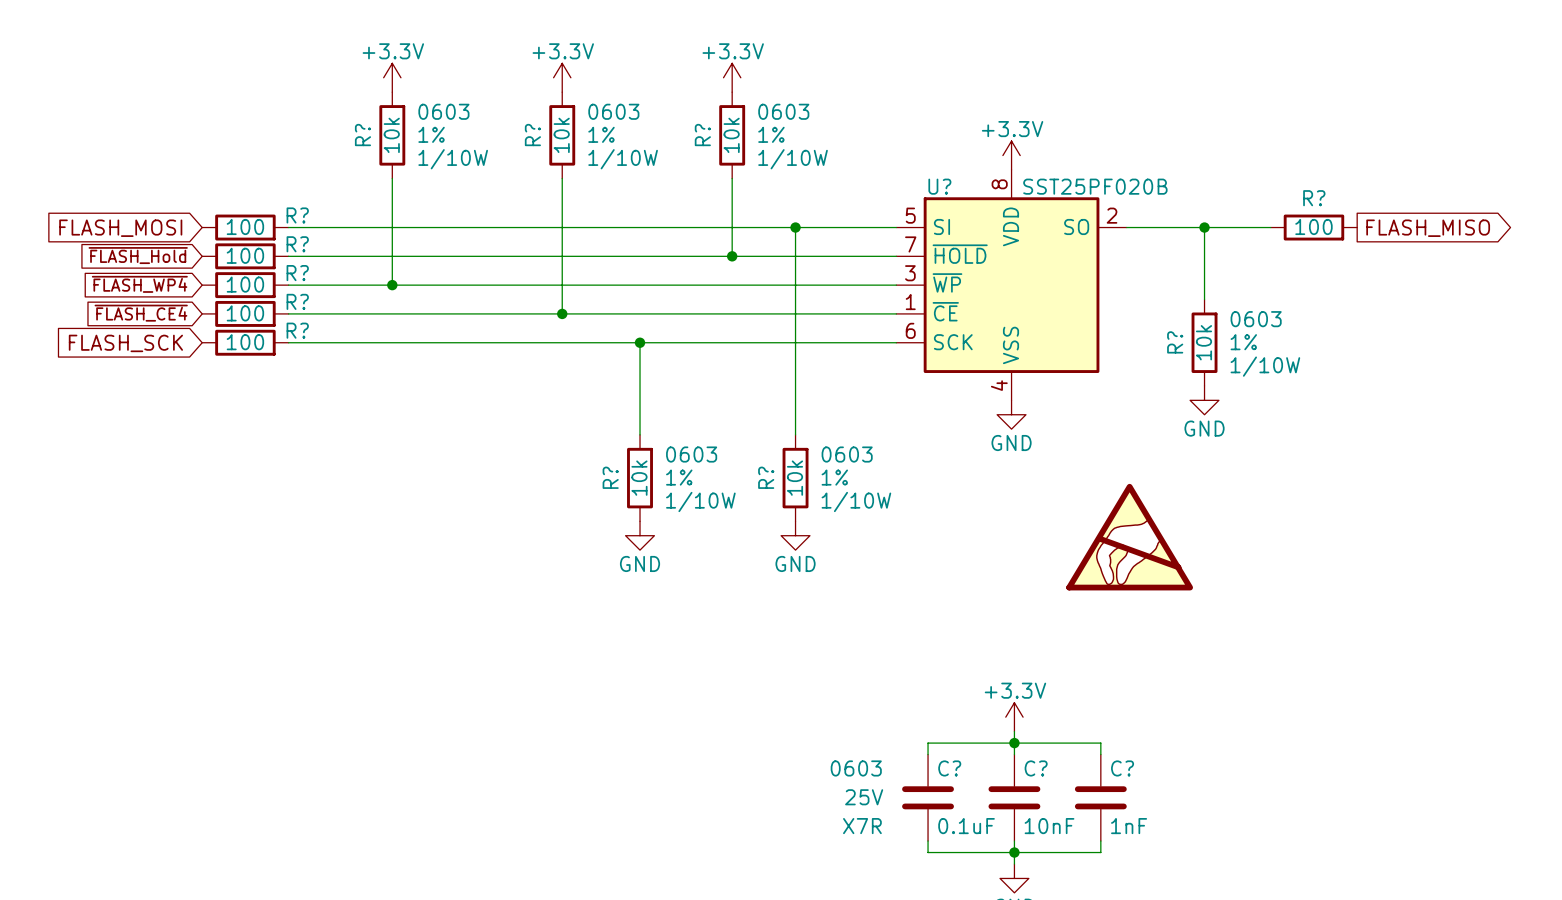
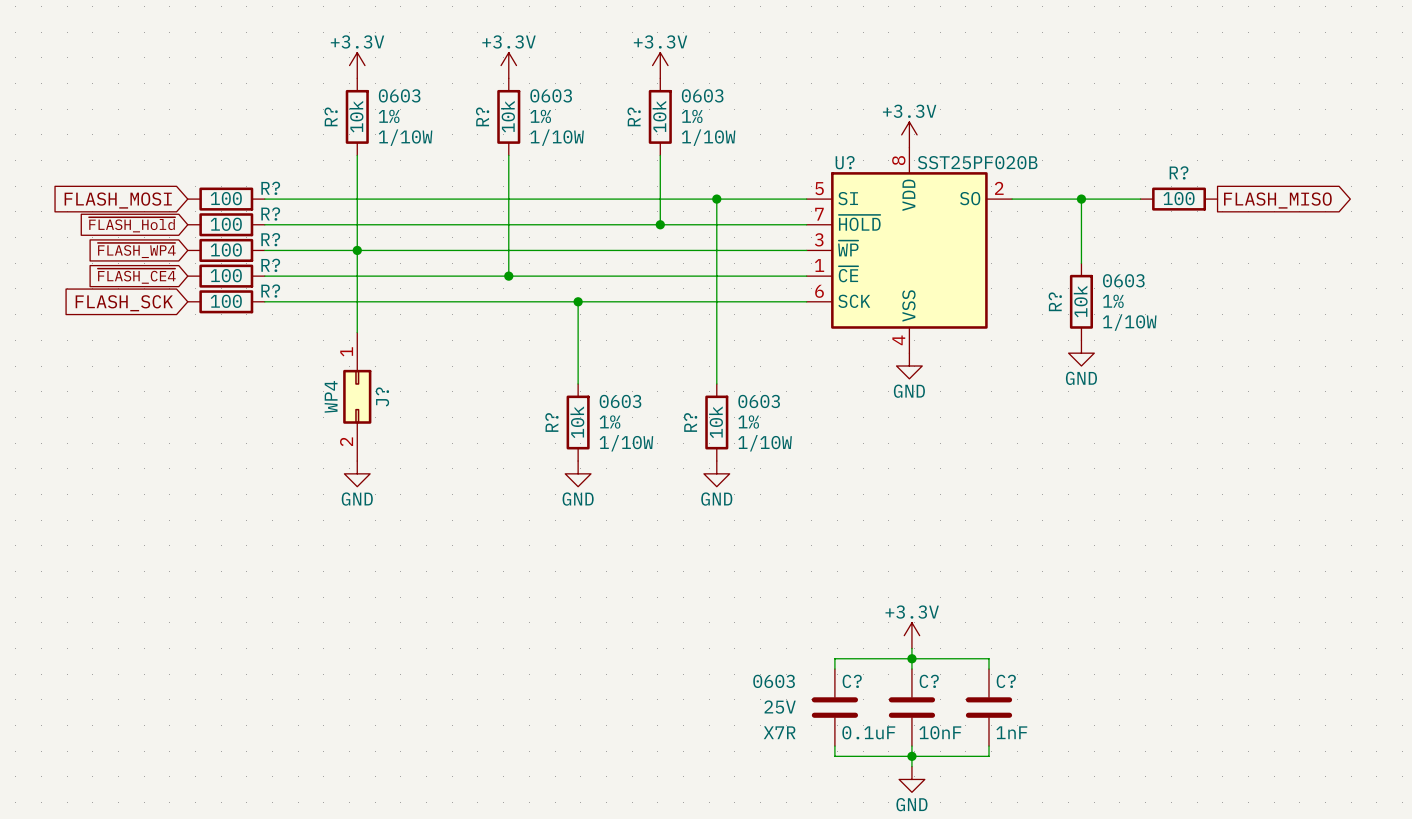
wire: none -> (357, 250) (357, 332)
J?: none -> WP4 (357, 396)
power symbol: none -> GND (357, 473)
power symbol: (1129, 537) -> none

